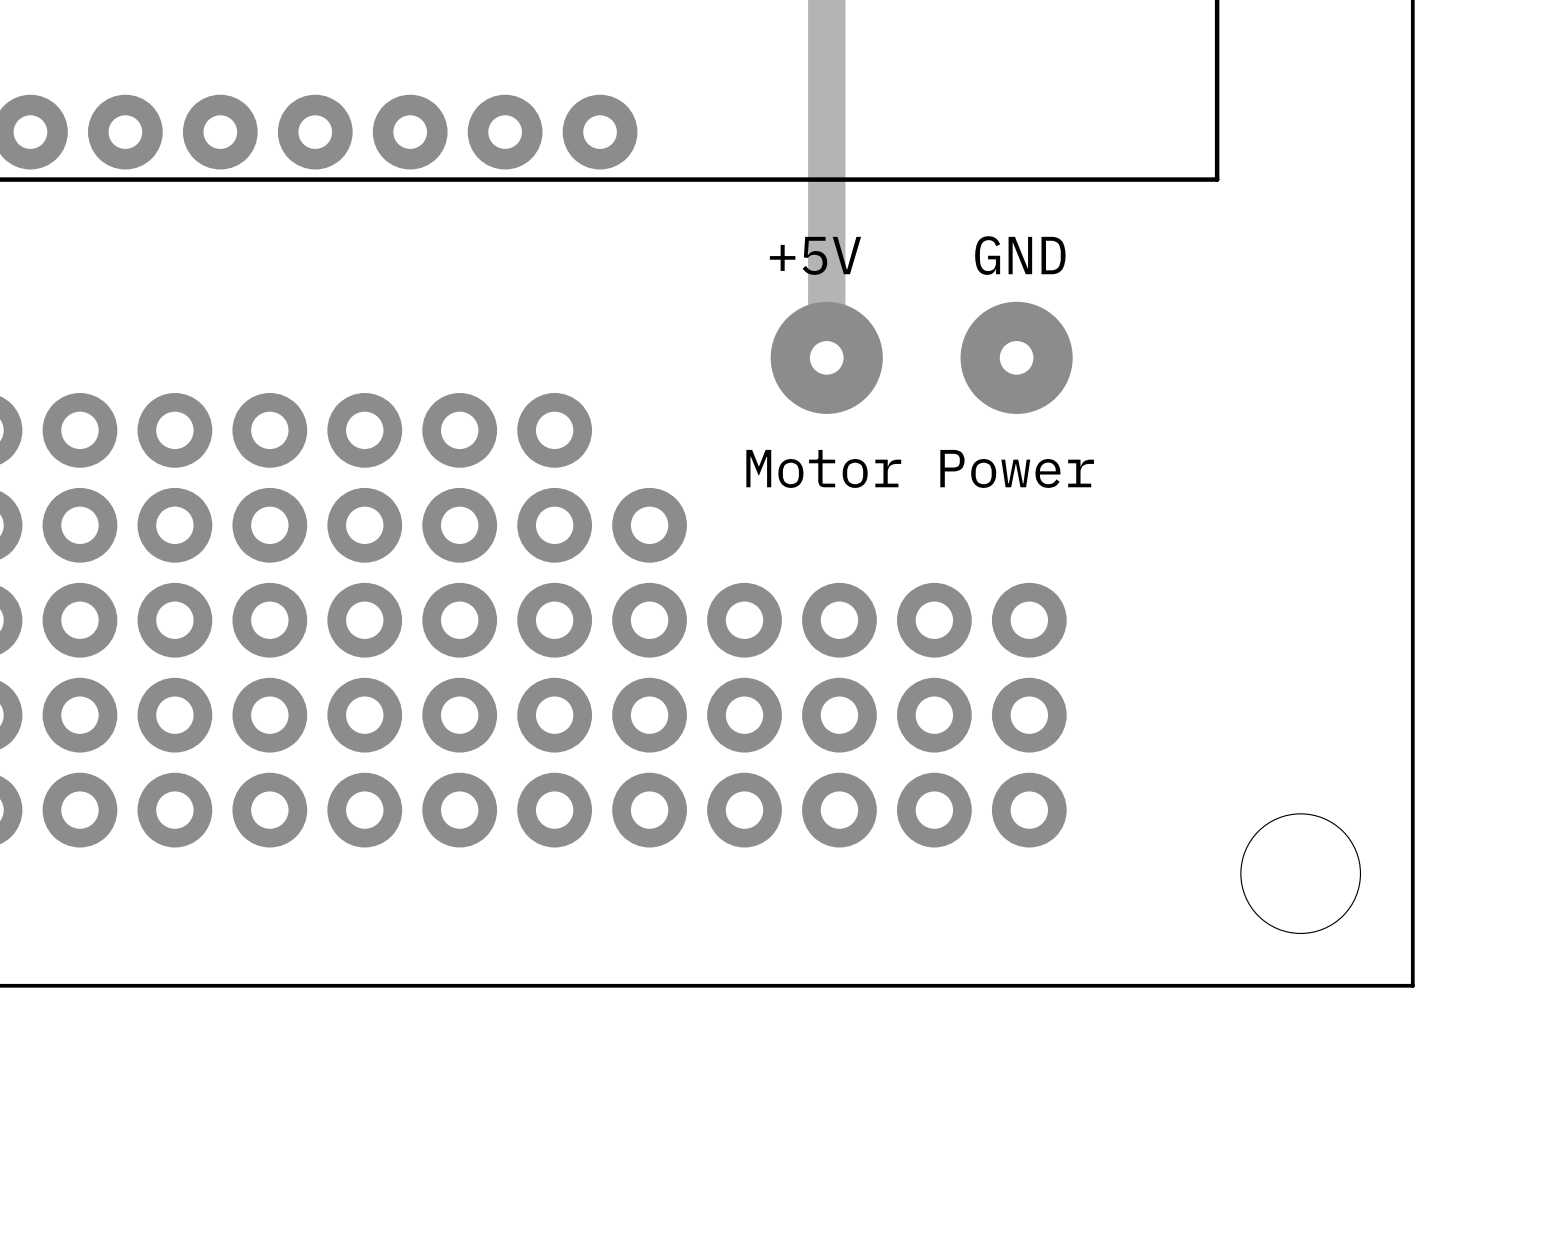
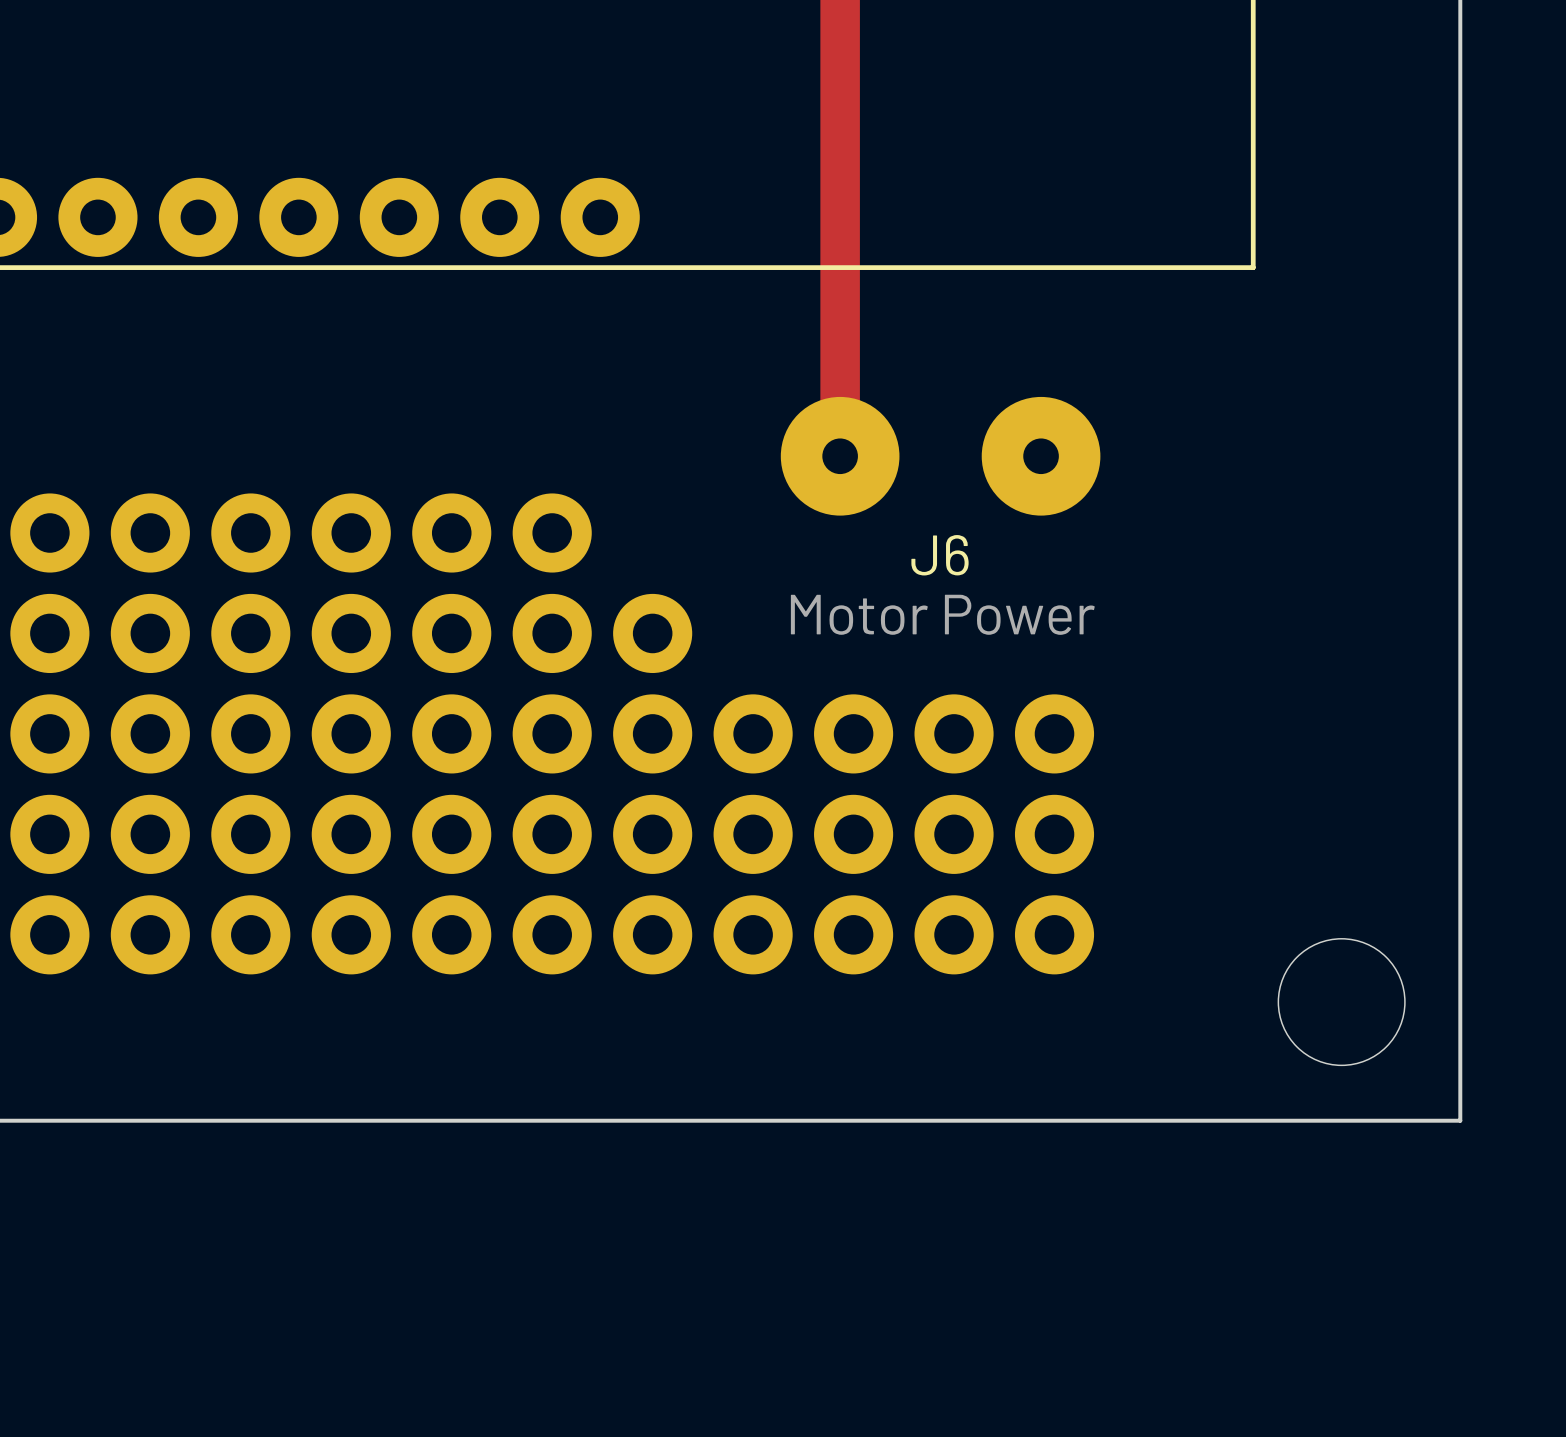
text: +5V (815, 255) -> none
text: GND (1020, 255) -> none
J6 name: none -> J6 (940, 555)
text: Motor Power (920, 468) -> none
J6 value: none -> Motor Power (942, 614)

